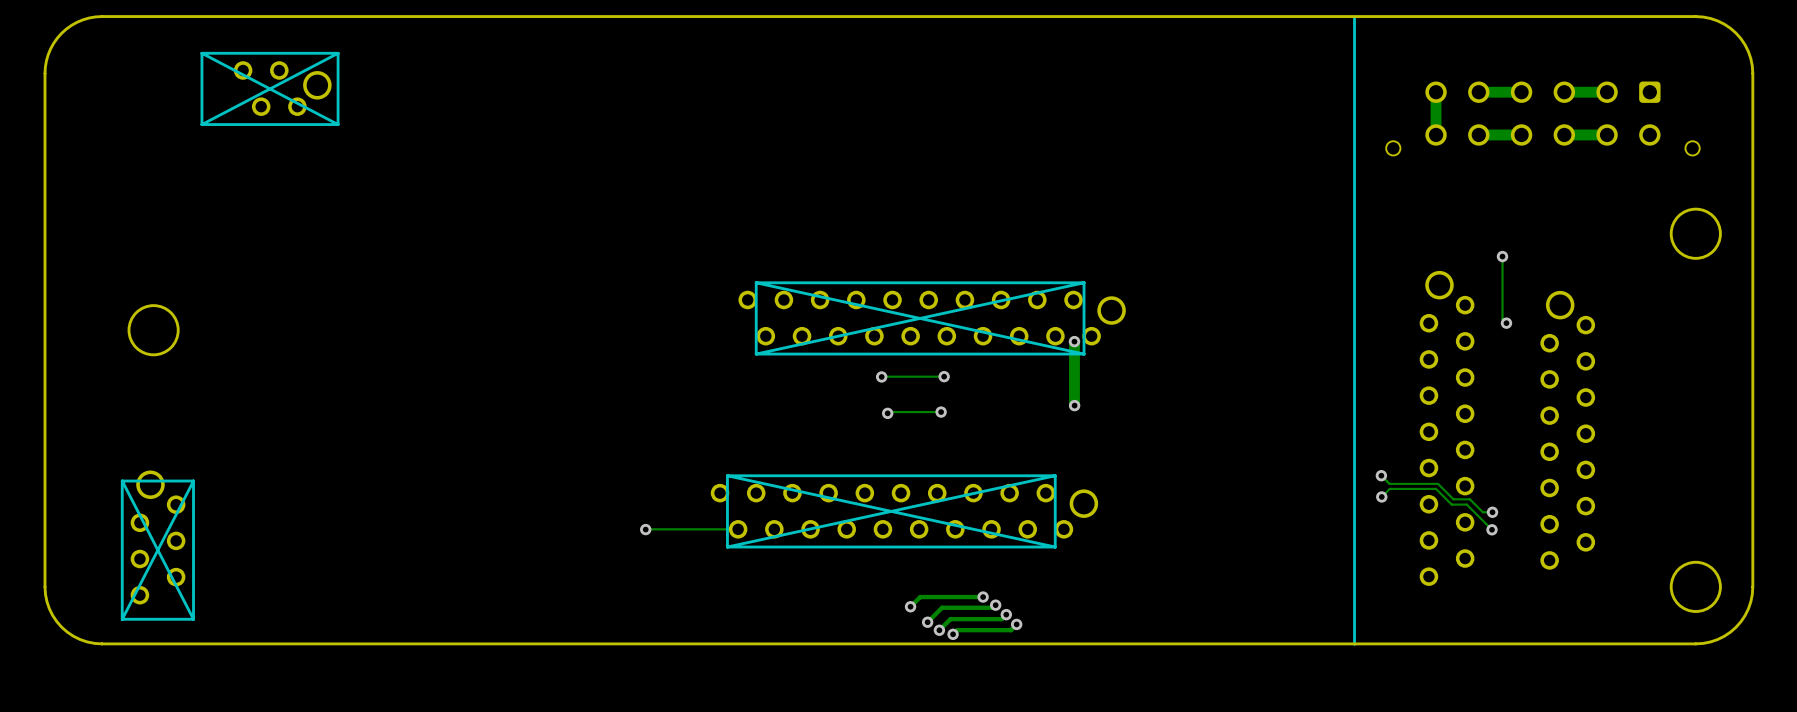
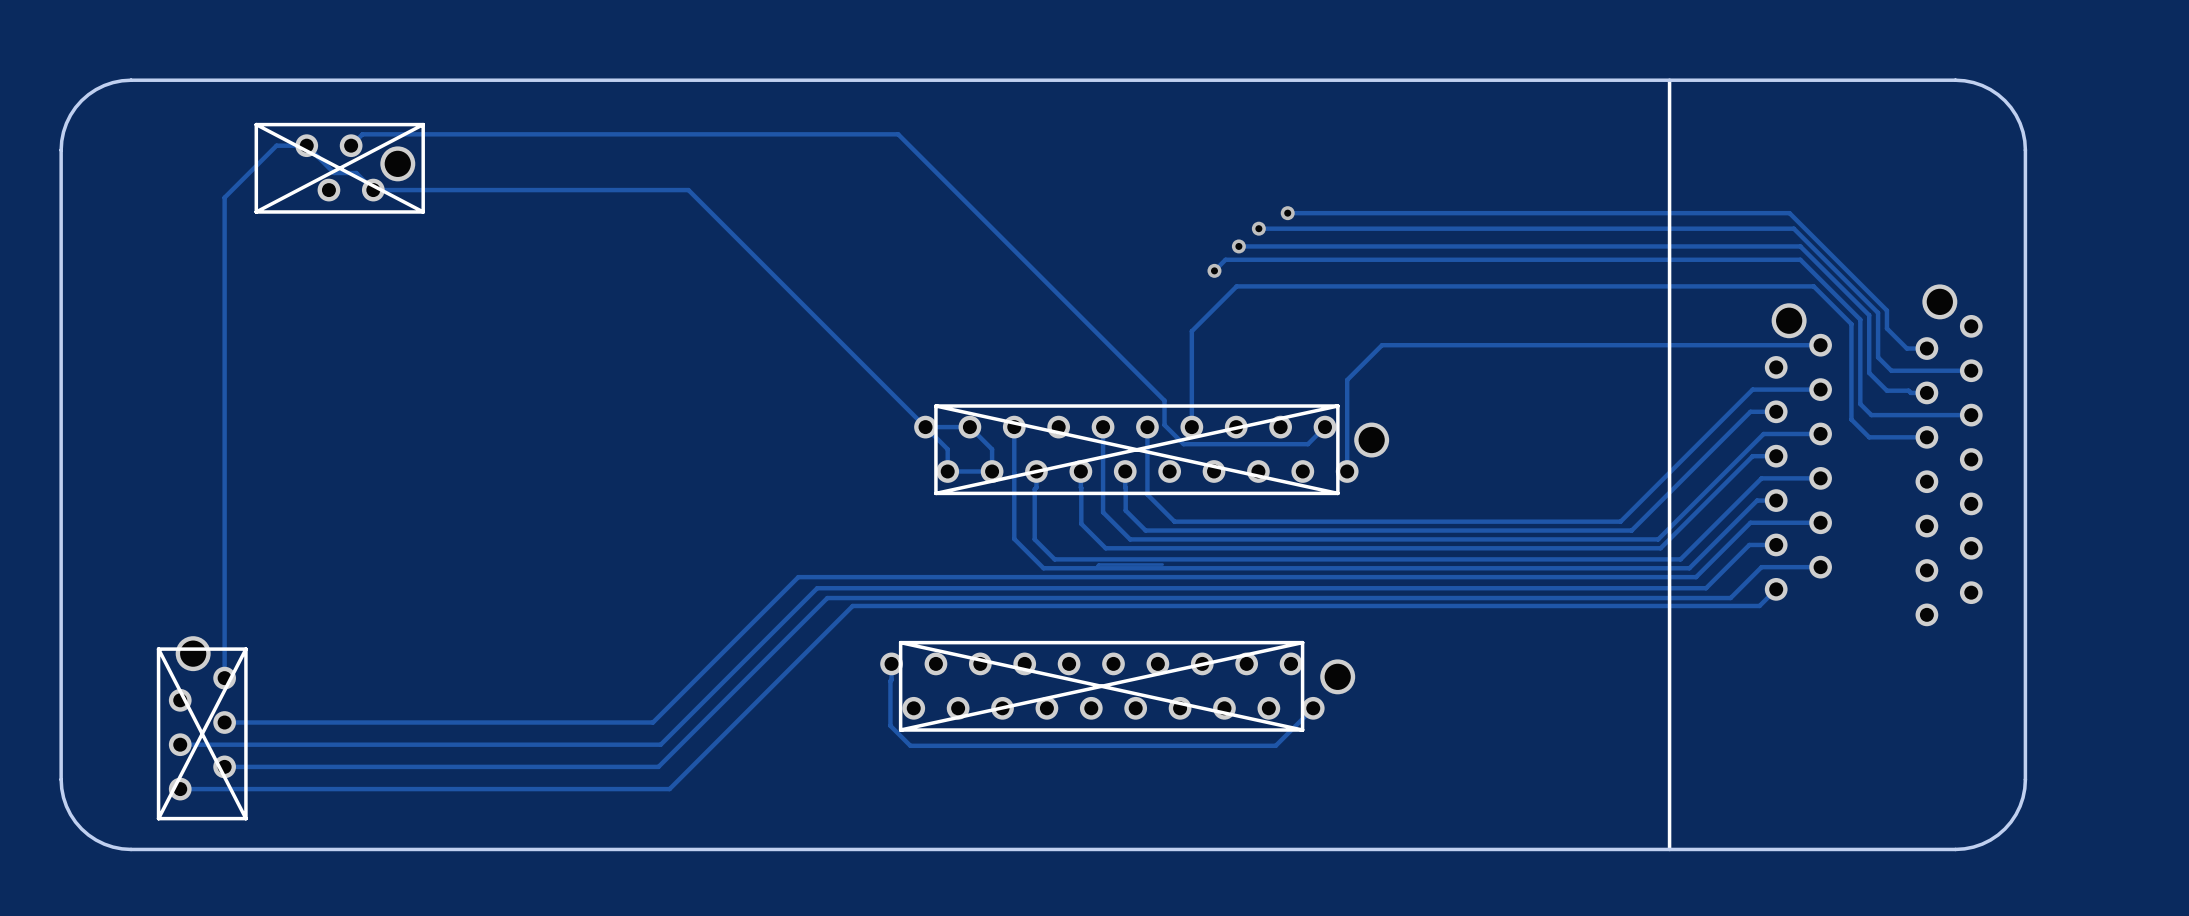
board edge: (1695, 16) (102, 16) (83, 19) (71, 25) (57, 38) (50, 48) (45, 67) (45, 586) (49, 608) (56, 621) (67, 632) (87, 641) (102, 643) (1695, 643) (1717, 639) (1730, 632) (1745, 615) (1750, 601) (1752, 586) (1752, 73) (1748, 51) (1736, 33) (1717, 20) (1695, 16) -> (1955, 80) (1982, 85) (2004, 100) (2020, 123) (2025, 150) (2025, 779) (2023, 797) (2016, 814) (1998, 835) (1982, 844) (1955, 849) (131, 849) (112, 847) (88, 835) (75, 822) (66, 806) (61, 779) (61, 150) (63, 132) (70, 115) (88, 94) (104, 85) (131, 80) (1955, 80)
track: none -> (351, 145) (362, 134) (898, 134) (1164, 400) (1164, 425) (1183, 444) (1307, 444) (1325, 427)
track: (1436, 92) (1436, 134) -> none
track: (1521, 92) (1478, 92) -> none
track: (1607, 92) (1564, 92) -> none
part: (1542, 118) -> none
track: none -> (1287, 213) (1789, 213) (1886, 310) (1886, 328) (1906, 348) (1926, 348)
via: none -> (1287, 213)
track: (1521, 134) (1478, 134) -> none
track: (1607, 134) (1564, 134) -> none
track: none -> (1258, 228) (1793, 228) (1878, 312) (1878, 357) (1891, 370) (1971, 370)
via: none -> (1258, 228)
track: none -> (1238, 246) (1800, 246) (1869, 315) (1869, 372) (1886, 390) (1926, 392)
via: none -> (1238, 246)
track: none -> (1214, 270) (1225, 259) (1800, 259) (1860, 319) (1860, 404) (1871, 415) (1971, 415)
via: none -> (1214, 270)
round board edge: [1669, 207, 1722, 260] -> none
track: none -> (1820, 345) (1382, 345) (1347, 380) (1347, 471)
track: (1502, 256) (1502, 319) (1506, 323) -> none
via: (1502, 256) -> none
track: none -> (1820, 389) (1752, 389) (1620, 521) (1174, 521) (1147, 494) (1147, 427)
track: none -> (1776, 411) (1750, 411) (1631, 530) (1145, 530) (1125, 510) (1125, 471)
track: none -> (925, 427) (969, 427) (992, 449) (992, 471) (947, 471) (947, 449) (688, 190) (373, 190) (356, 173) (334, 173) (306, 145) (276, 145) (224, 197) (224, 678)
track: none -> (1014, 427) (1014, 538) (1043, 568) (1689, 568) (1757, 500) (1776, 500)
track: none -> (1103, 427) (1103, 512) (1130, 539) (1658, 539) (1763, 433) (1820, 433)
track: none -> (1191, 427) (1191, 331) (1236, 286) (1813, 286) (1851, 324) (1851, 419) (1869, 437) (1926, 437)
round board edge: [127, 304, 180, 357] -> none
part: none -> (1798, 451)
track: none -> (1776, 456) (1752, 456) (1660, 548) (1105, 548) (1081, 523) (1080, 471)
via: (1506, 323) -> none
track: none -> (1036, 471) (1034, 539) (1054, 559) (1680, 559) (1761, 478) (1820, 478)
track: (1074, 341) (1074, 405) -> none
via: (1074, 341) -> none
via: (881, 376) -> none
track: (944, 376) (881, 376) -> none
via: (944, 376) -> none
track: none -> (1820, 522) (1750, 522) (1696, 577) (798, 577) (652, 722) (224, 722)
track: none -> (1776, 544) (1749, 544) (1706, 588) (817, 588) (660, 744) (180, 744)
via: (1074, 405) -> none
via: (941, 412) -> none
via: (887, 413) -> none
track: none -> (1820, 567) (1761, 567) (1730, 598) (827, 598) (658, 766) (224, 766)
part: (1447, 428) -> none
part position: (1567, 430) -> (1949, 455)
track: none -> (1776, 589) (1759, 605) (852, 605) (669, 789) (180, 789)
track: (1381, 475) (1389, 483) (1438, 483) (1453, 499) (1469, 499) (1482, 512) (1492, 512) -> none
via: (1381, 475) -> none
track: none -> (891, 663) (890, 725) (910, 745) (1275, 745) (1313, 708)
track: (1381, 496) (1389, 488) (1435, 488) (1451, 504) (1466, 504) (1492, 529) -> none
via: (1381, 496) -> none
via: (1492, 512) -> none
via: (645, 529) -> none
track: (738, 529) (645, 529) -> none
via: (1492, 529) -> none
round board edge: [1669, 560, 1722, 613] -> none
track: (983, 597) (920, 597) (910, 606) -> none
via: (983, 597) -> none
track: (995, 605) (993, 607) (942, 607) (927, 622) -> none
via: (995, 605) -> none
via: (910, 606) -> none
track: (1006, 614) (1001, 619) (950, 619) (939, 630) -> none
via: (1006, 614) -> none
via: (927, 622) -> none
track: (1016, 624) (1010, 630) (957, 630) (953, 634) -> none
via: (1016, 624) -> none
via: (939, 630) -> none
via: (953, 634) -> none

